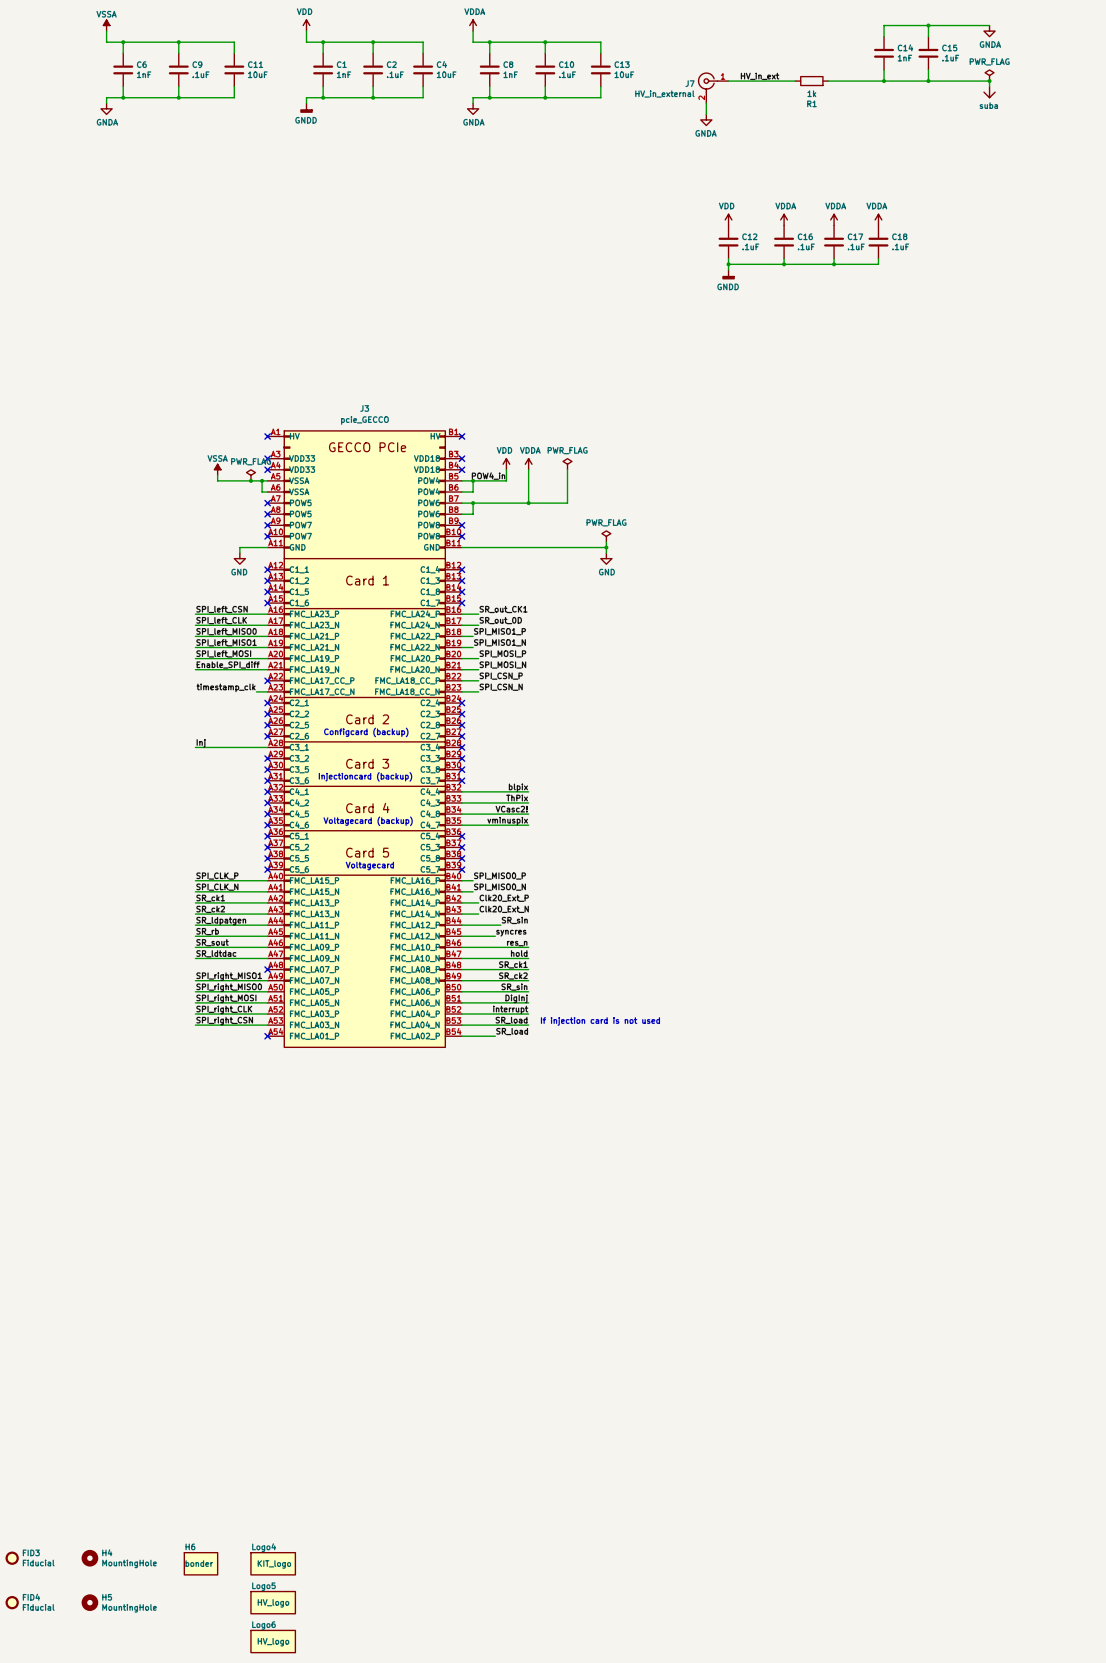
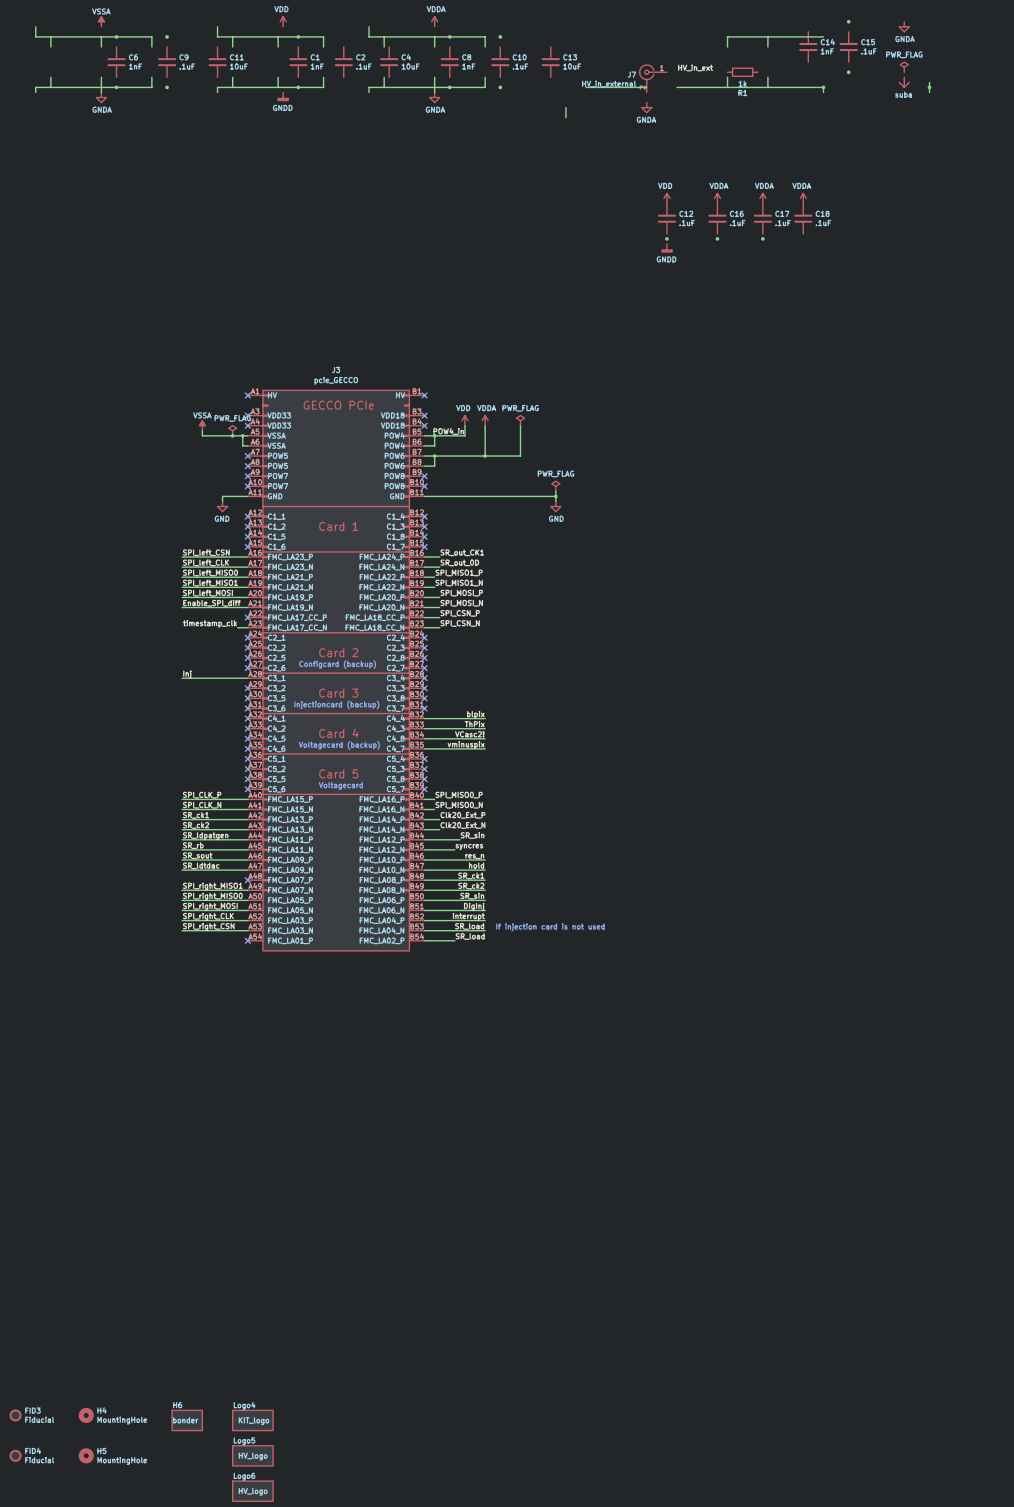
wire: (928, 25) (928, 36) -> (767, 36) (767, 47)
wire: (989, 25) (884, 25) (884, 36) -> (823, 36) (727, 36) (727, 47)
wire: none -> (35, 26) (35, 36) (101, 36) (101, 47)
wire: (106, 31) (106, 42) -> none
wire: (306, 31) (306, 42) -> (217, 26) (217, 36) (283, 36)
wire: (473, 31) (473, 42) -> none
wire: (123, 42) (123, 53) -> (50, 36) (50, 47)
wire: (162, 42) (234, 42) (234, 53) -> (151, 36) (151, 47)
wire: (178, 42) (178, 53) -> none
wire: (323, 42) (323, 53) -> (232, 36) (232, 47)
wire: (350, 42) (400, 42) -> (369, 26) (369, 36)
wire: none -> (323, 36) (323, 47)
wire: (373, 42) (373, 53) -> (278, 36) (278, 47)
junction: (373, 42) -> none
wire: (423, 42) (423, 53) -> (389, 36) (434, 36) (434, 47)
wire: (489, 42) (489, 53) -> (384, 36) (384, 47)
wire: (528, 42) (600, 42) (600, 53) -> (485, 36) (485, 47)
wire: (545, 42) (545, 53) -> none
wire: (884, 69) (884, 81) -> (727, 77) (727, 87)
wire: (928, 69) (928, 81) -> (767, 77) (767, 87)
wire: (728, 81) (795, 81) -> (586, 87) (646, 87)
wire: (828, 81) (989, 81) (989, 86) -> (677, 87) (823, 87) (823, 92)
junction position: (884, 81) -> (823, 87)
junction: (989, 81) -> none
wire: none -> (101, 77) (101, 87) (35, 87) (35, 92)
wire: (123, 86) (123, 97) -> (50, 77) (50, 87)
wire: (178, 86) (178, 97) -> none
wire: (234, 86) (234, 97) (162, 97) -> (151, 77) (151, 87)
wire: (323, 86) (323, 97) -> (232, 77) (232, 87)
wire: none -> (323, 77) (323, 87)
wire: (373, 86) (373, 97) -> (278, 77) (278, 87)
wire: (423, 86) (423, 97) -> (434, 77) (434, 87) (389, 87)
wire: (489, 86) (489, 97) -> (384, 77) (384, 87)
wire: (545, 86) (545, 97) -> none
wire: (600, 86) (600, 97) (528, 97) -> (485, 77) (485, 87)
wire: none -> (929, 82) (929, 92)
wire: (306, 97) (306, 103) -> (283, 87) (217, 87) (217, 92)
wire: (350, 97) (400, 97) -> (369, 92) (369, 87)
junction: (373, 97) -> none
junction: none -> (929, 87)
wire: (706, 103) (706, 114) -> (565, 107) (565, 117)
wire: (728, 258) (728, 269) -> none
wire: (784, 258) (784, 264) -> none
wire: (834, 258) (834, 264) -> none
wire: (878, 258) (878, 264) (728, 264) -> none

